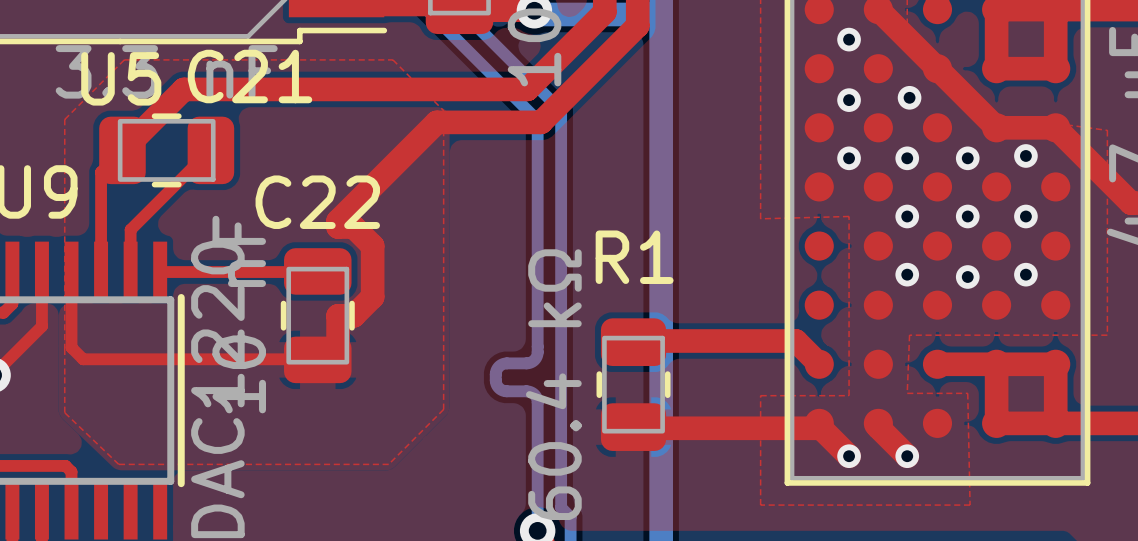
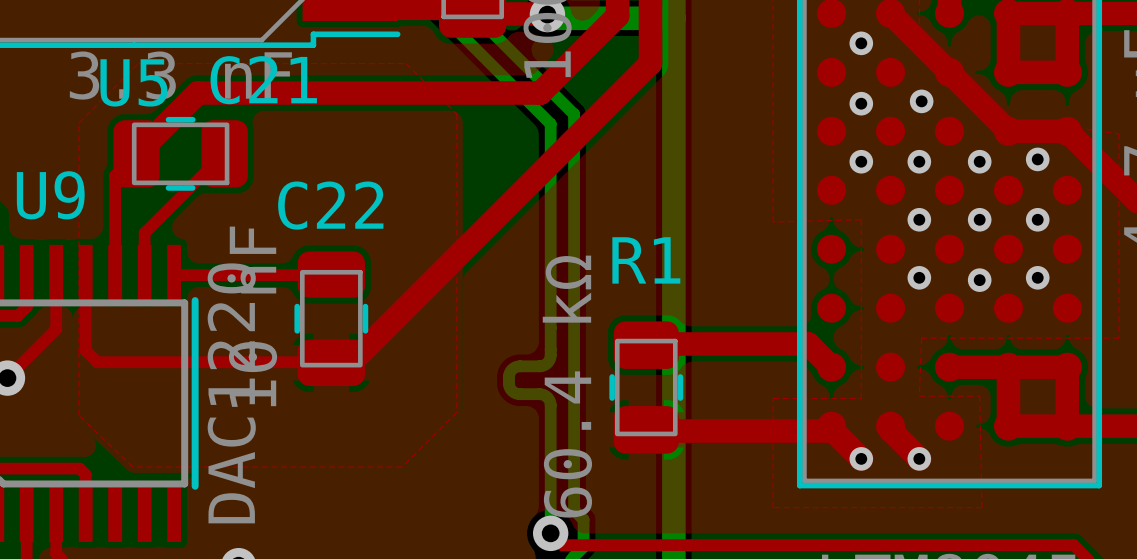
top track: (637, 25) (541, 122) (436, 122) (338, 221) (338, 227) (353, 227) (372, 245) (372, 296) (353, 315) (338, 315) (338, 359) -> (650, 29) (650, 63) (351, 362)

